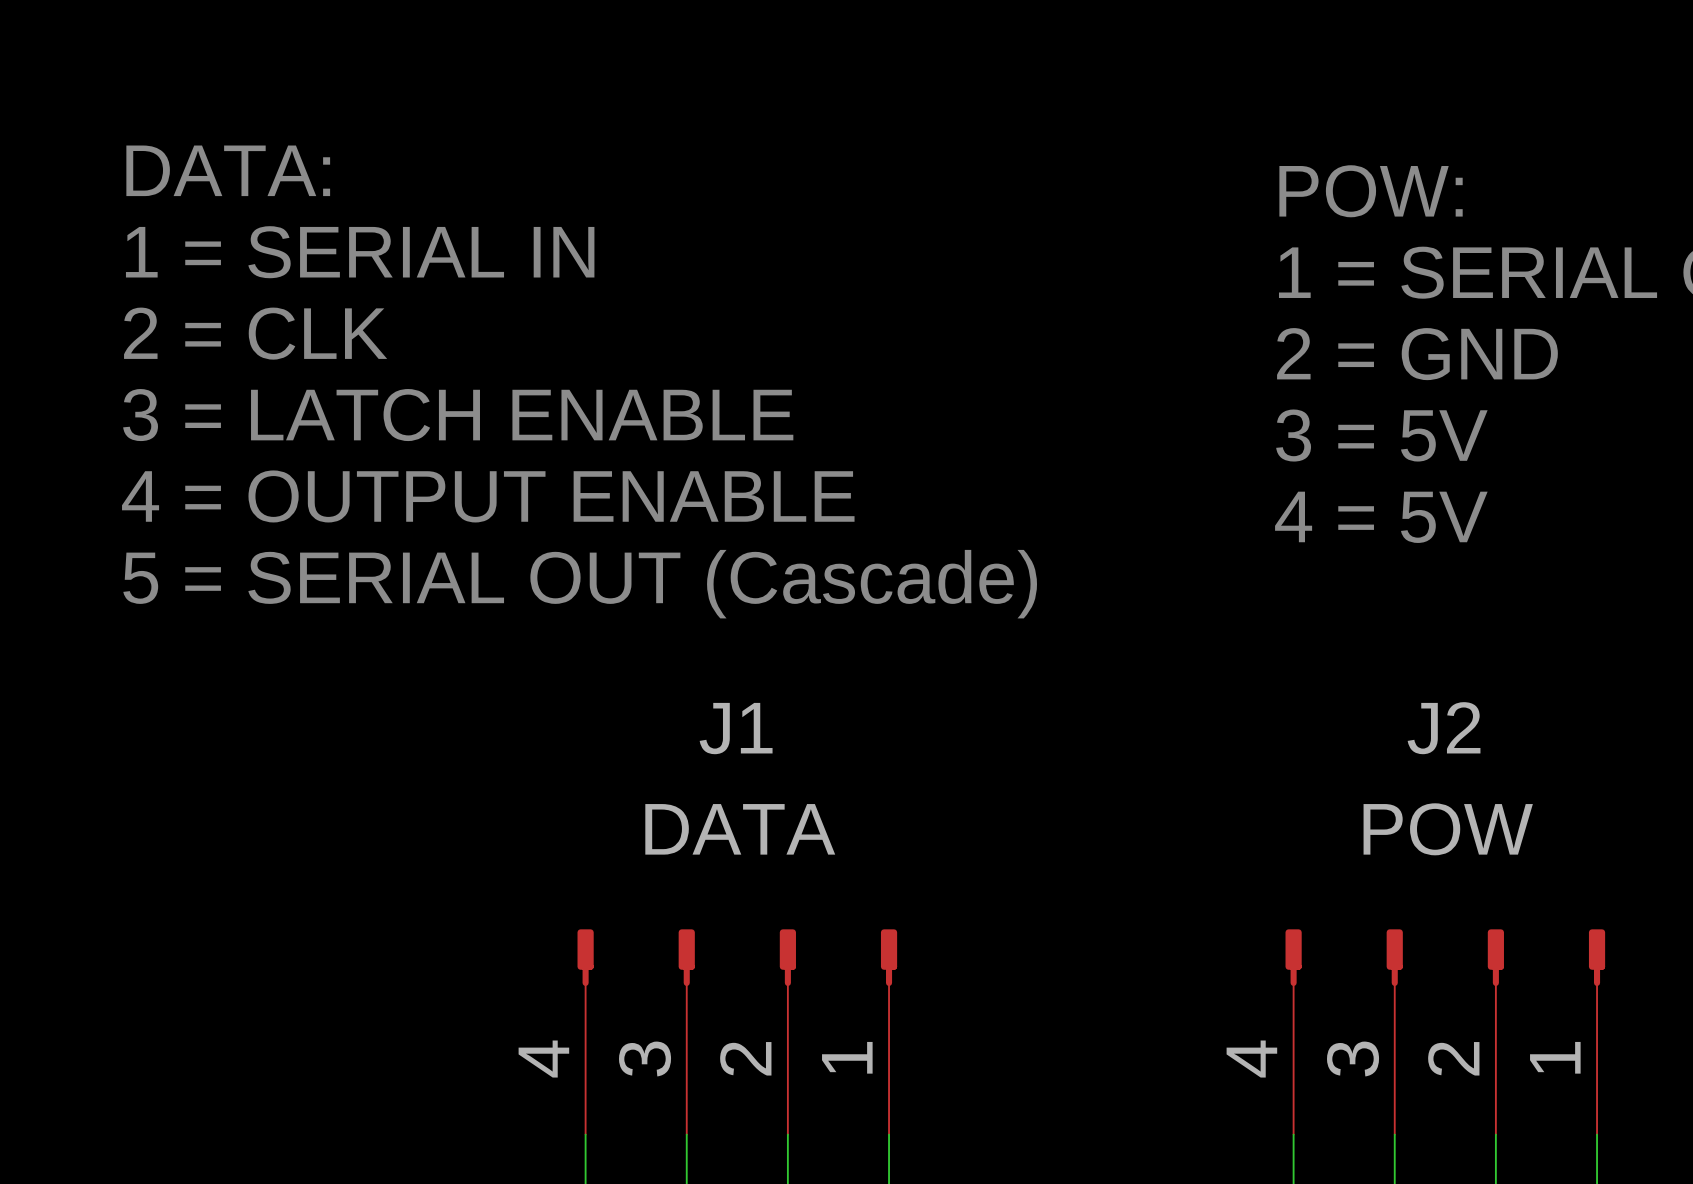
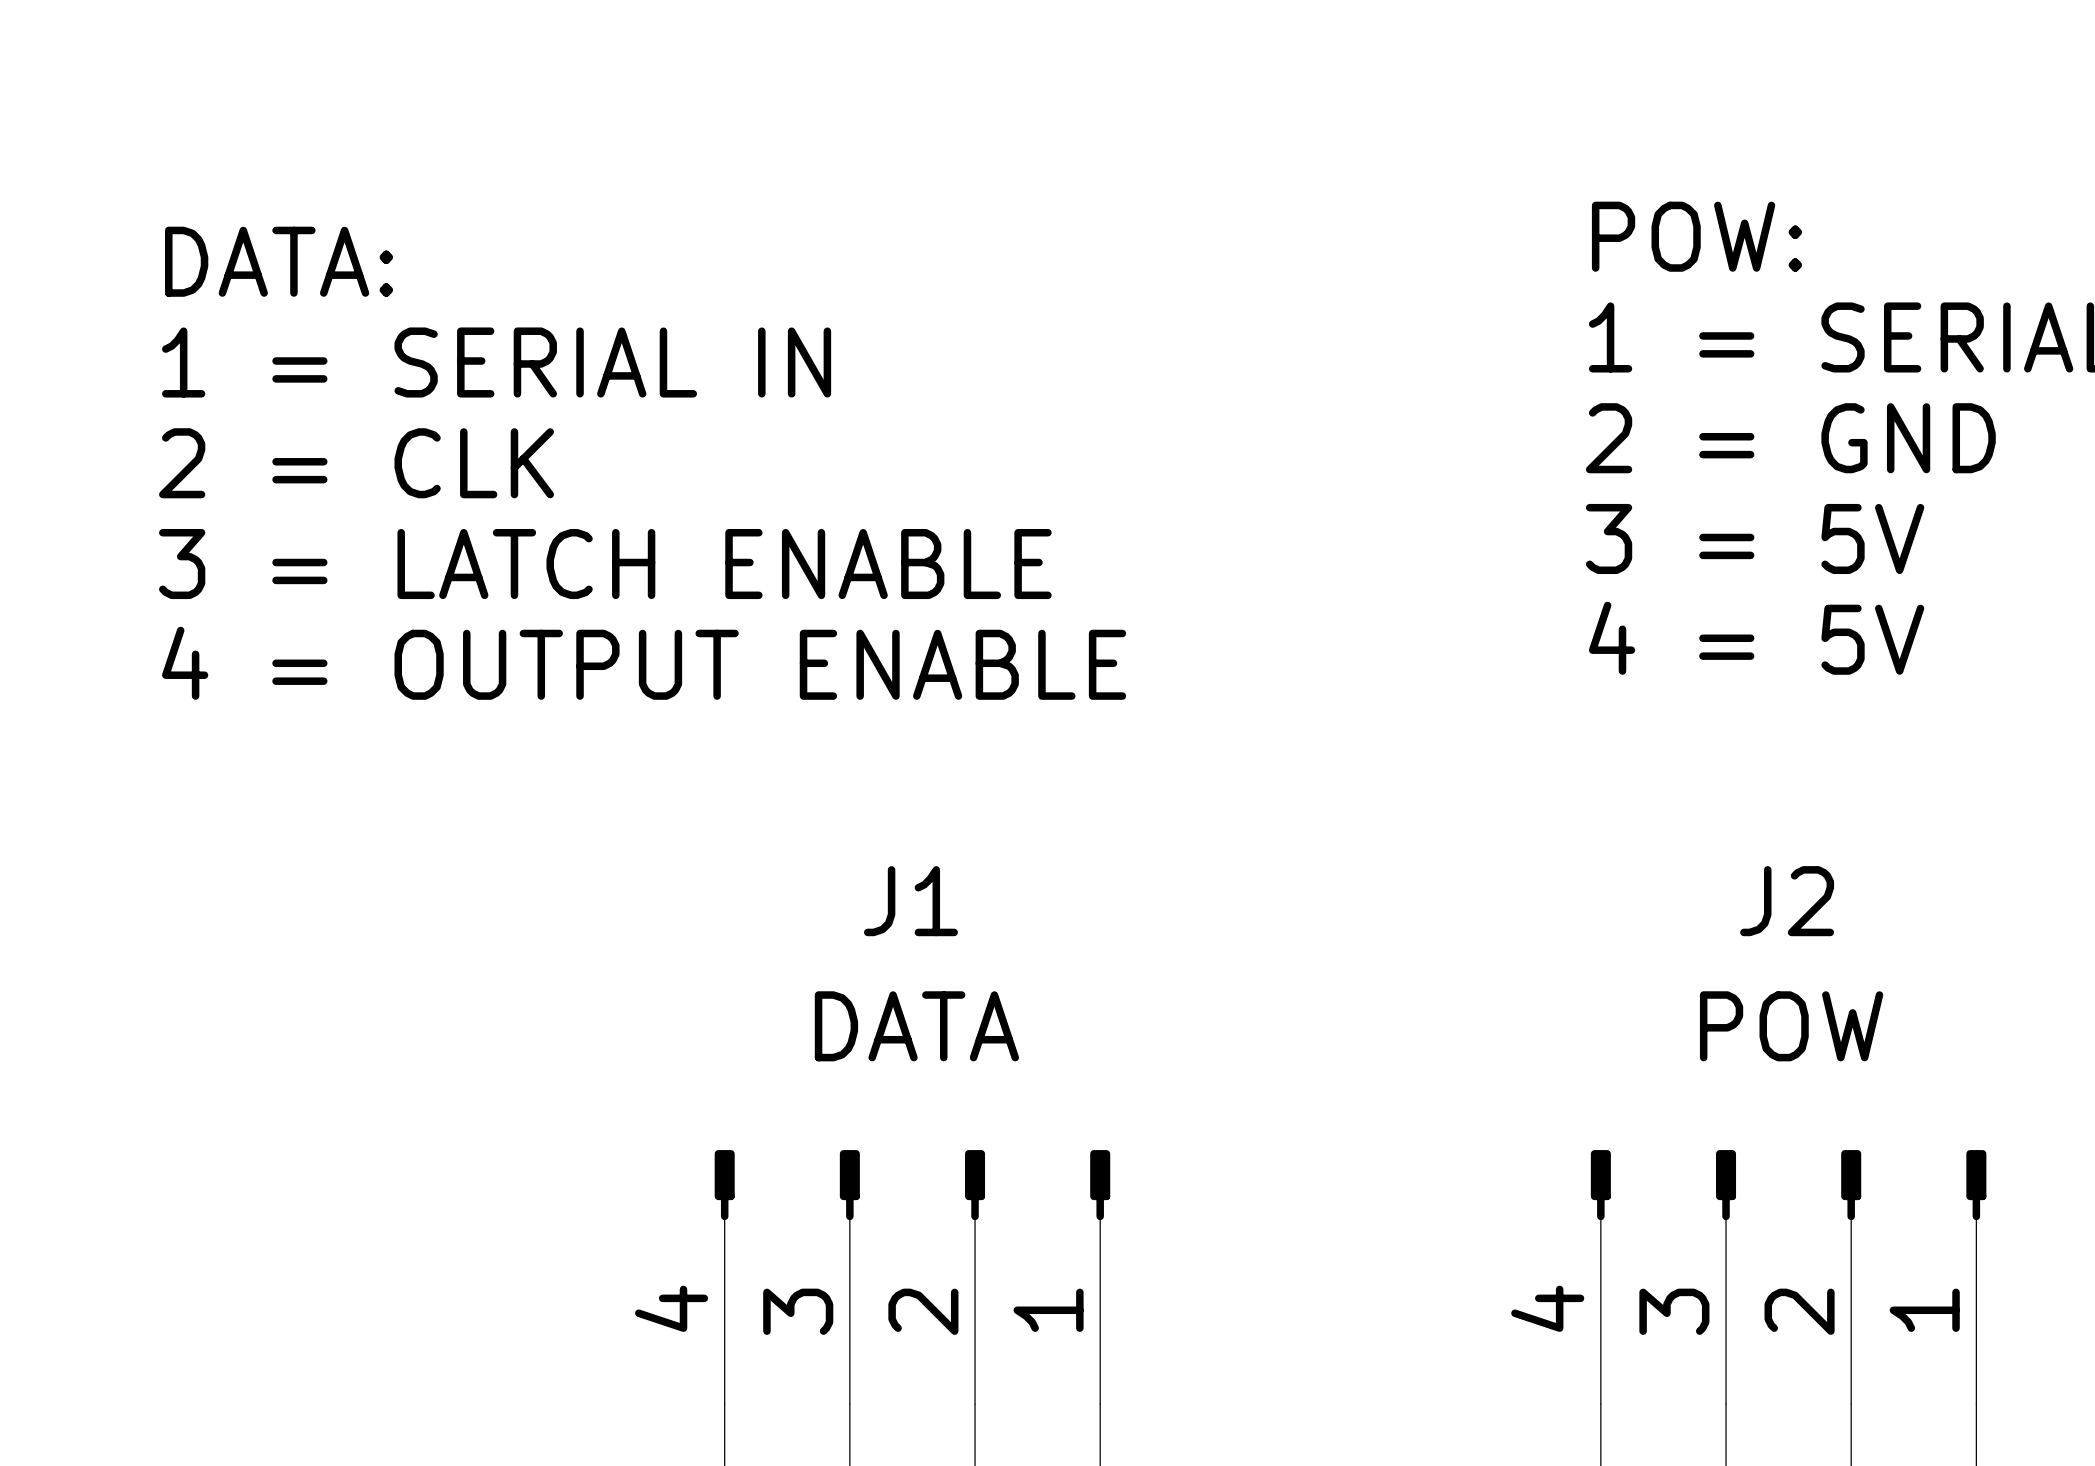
text position: DATA: (228, 170) -> DATA: (279, 261)
text position: 1 = SERIAL IN (360, 252) -> 1 = SERIAL IN (496, 362)
text position: 2 = CLK (255, 333) -> 2 = CLK (356, 463)
text position: 3 = LATCH ENABLE (458, 415) -> 3 = LATCH ENABLE (605, 564)
text position: 4 = OUTPUT ENABLE (488, 496) -> 4 = OUTPUT ENABLE (644, 663)
text: 5 = SERIAL OUT (Cascade) (580, 584) -> none

